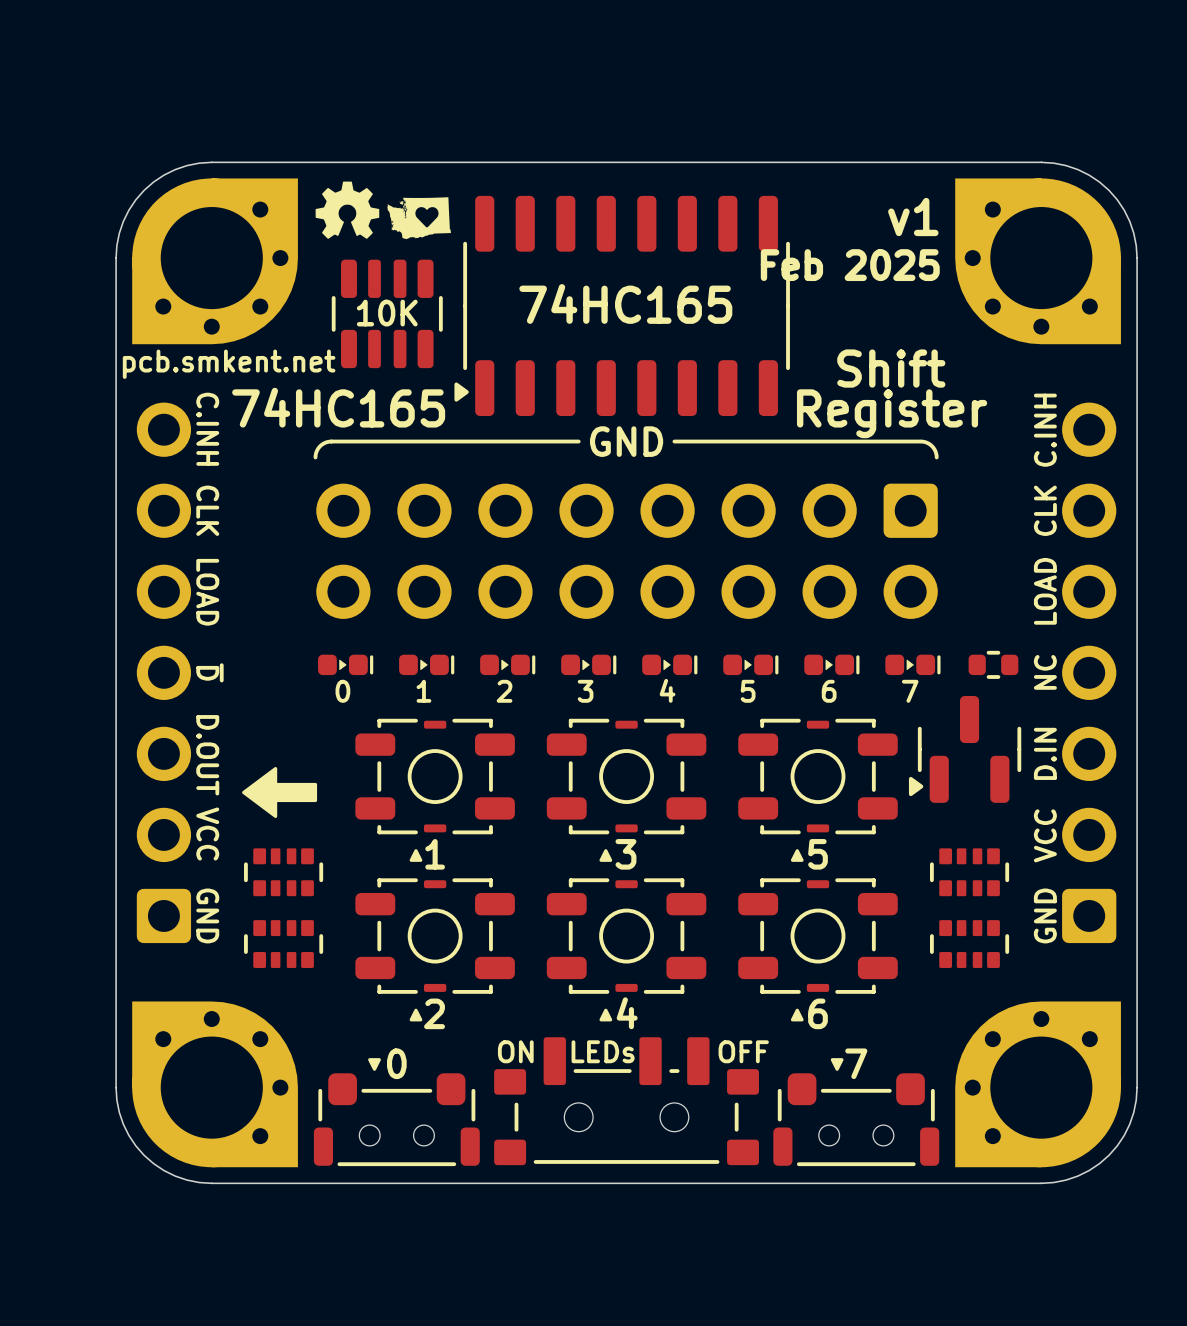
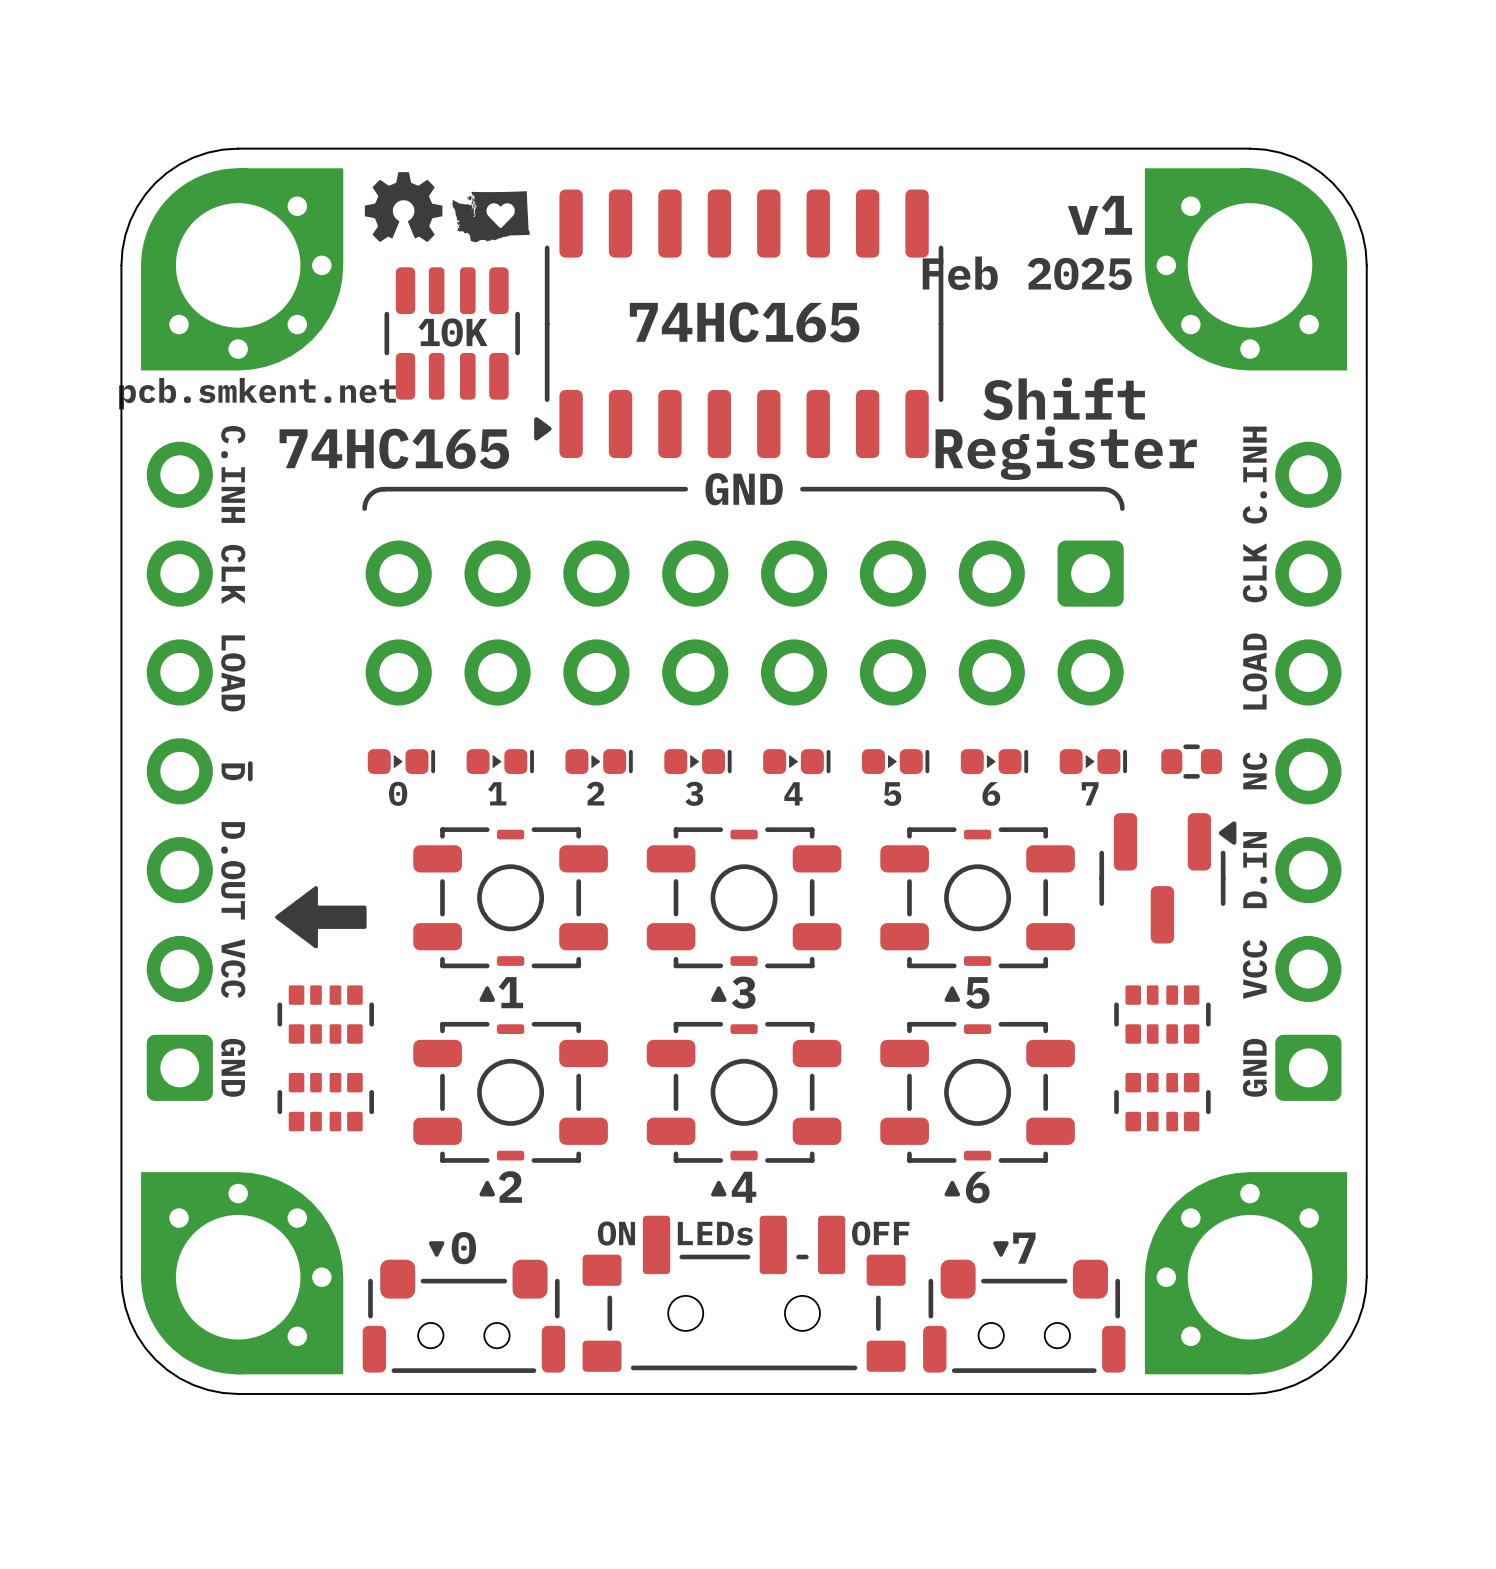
part rotation: 0° (965, 749) -> 180° (1167, 878)

